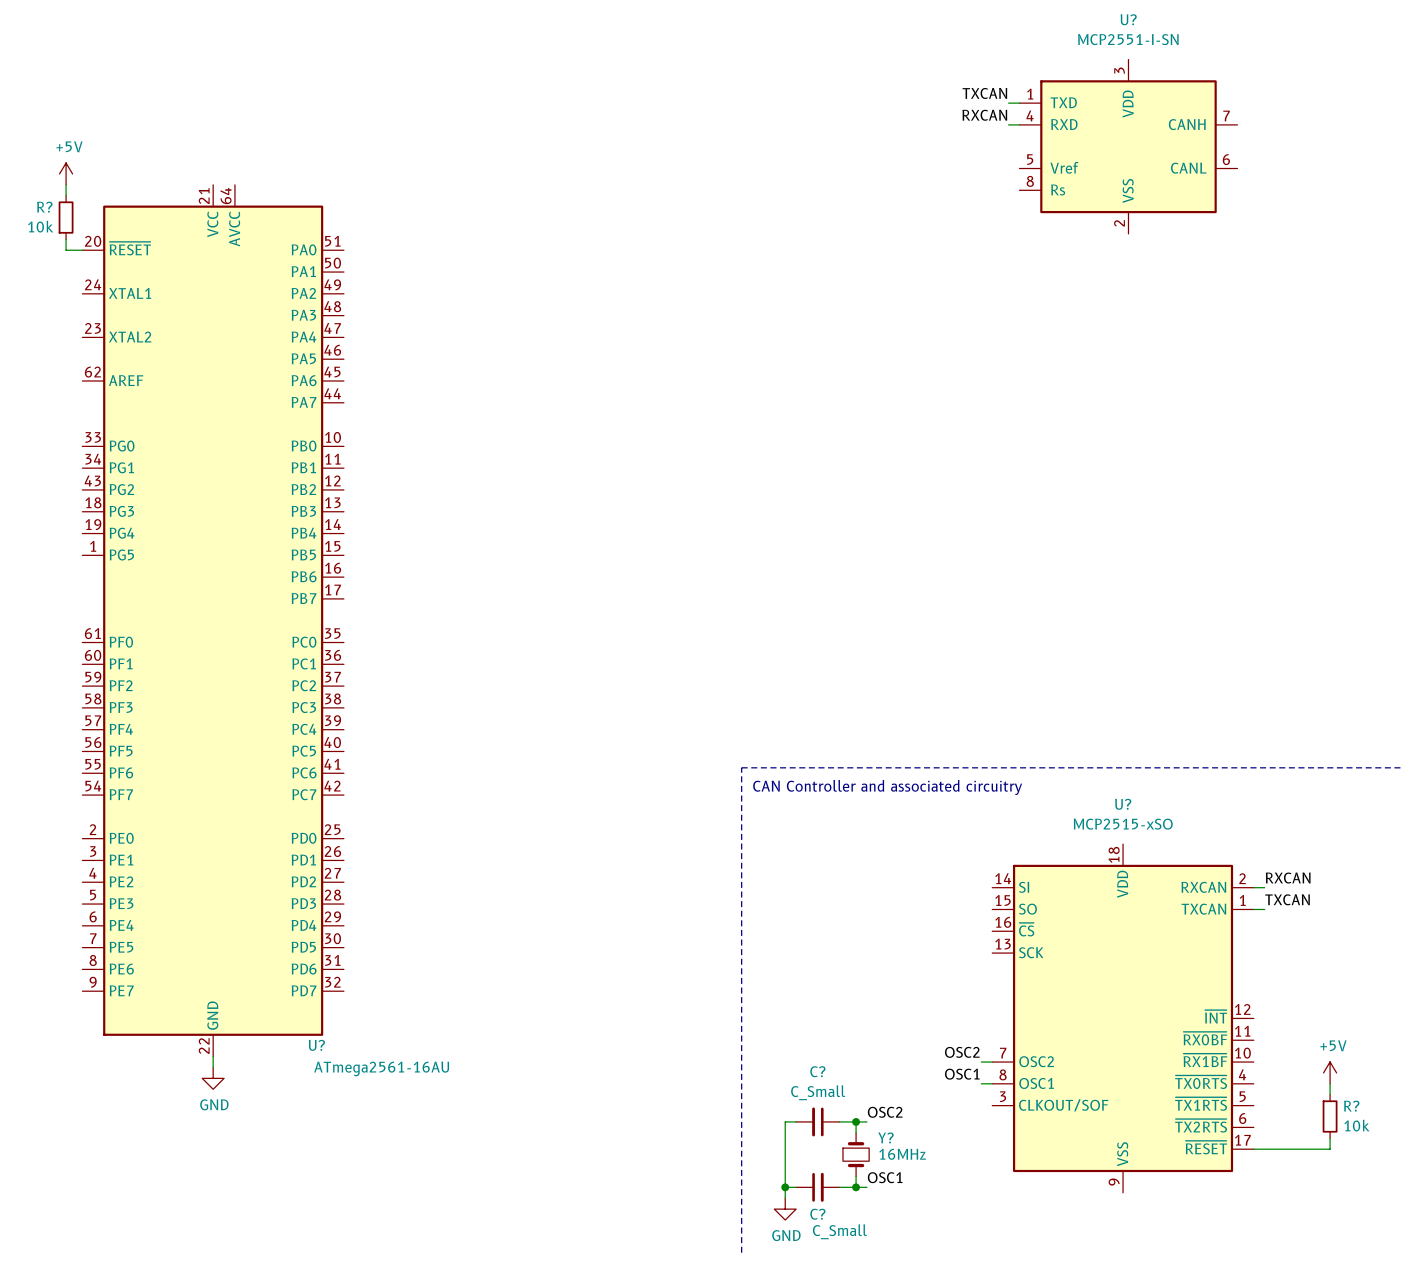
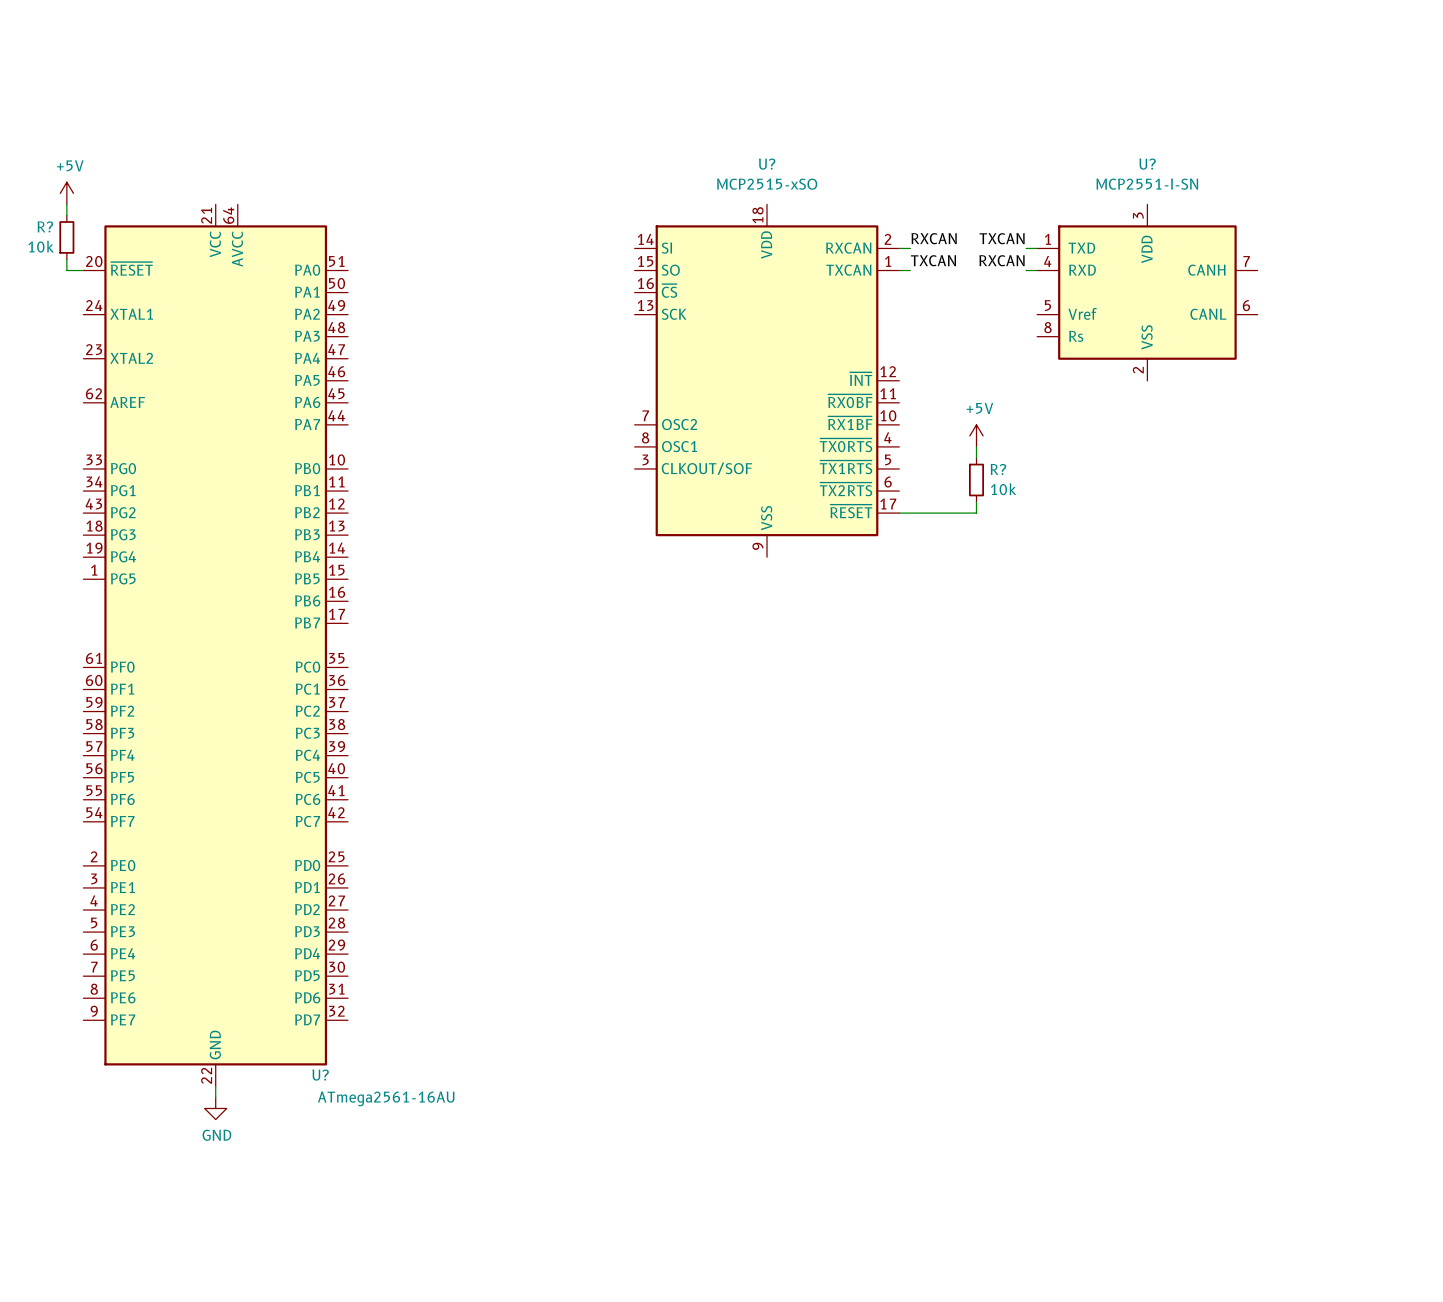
label: TXCAN (984, 93) -> none
wire: (1008, 103) (1019, 103) -> (1026, 248) (1037, 248)
label: RXCAN (984, 115) -> none
wire: (1008, 124) (1019, 124) -> (1026, 270) (1037, 270)
U? position: (1128, 146) -> (1147, 292)
label: none -> RXCAN (934, 238)
label: none -> TXCAN (1002, 238)
wire: none -> (899, 248) (910, 248)
label: none -> TXCAN (933, 260)
label: none -> RXCAN (1001, 260)
wire: none -> (899, 270) (910, 270)
U?: none -> MCP2515-xSO (767, 380)
power symbol: none -> +5V (976, 435)
wire: none -> (976, 446) (976, 457)
R?: none -> 10k (976, 480)
wire: none -> (976, 502) (976, 513) (899, 513)
line: (1400, 767) (741, 767) (741, 1252) -> none
text: CAN Controller and associated circuitry (887, 787) -> none
label: RXCAN (1288, 878) -> none
wire: (1253, 887) (1264, 887) -> none
label: TXCAN (1287, 899) -> none
wire: (1253, 909) (1264, 909) -> none
U?: MCP2515-xSO (1123, 1018) -> none
label: OSC2 (962, 1052) -> none
wire: (981, 1062) (992, 1062) -> none
power symbol: +5V (1330, 1072) -> none
label: OSC1 (962, 1074) -> none
wire: (981, 1083) (992, 1083) -> none
wire: (1330, 1083) (1330, 1094) -> none
label: OSC2 (885, 1112) -> none
R?: 10k (1330, 1116) -> none
wire: (796, 1121) (785, 1121) (785, 1198) -> none
C?: C_Small (817, 1121) -> none
wire: (839, 1121) (866, 1121) -> none
wire: (856, 1121) (856, 1132) -> none
junction: (856, 1121) -> none
wire: (1330, 1138) (1330, 1149) (1253, 1149) -> none
Y?: 16MHz (856, 1154) -> none
wire: (856, 1176) (856, 1187) -> none
label: OSC1 (885, 1177) -> none
wire: (785, 1187) (796, 1187) -> none
junction: (785, 1187) -> none
C?: C_Small (817, 1187) -> none
wire: (839, 1187) (866, 1187) -> none
junction: (856, 1187) -> none
power symbol: GND (785, 1209) -> none

